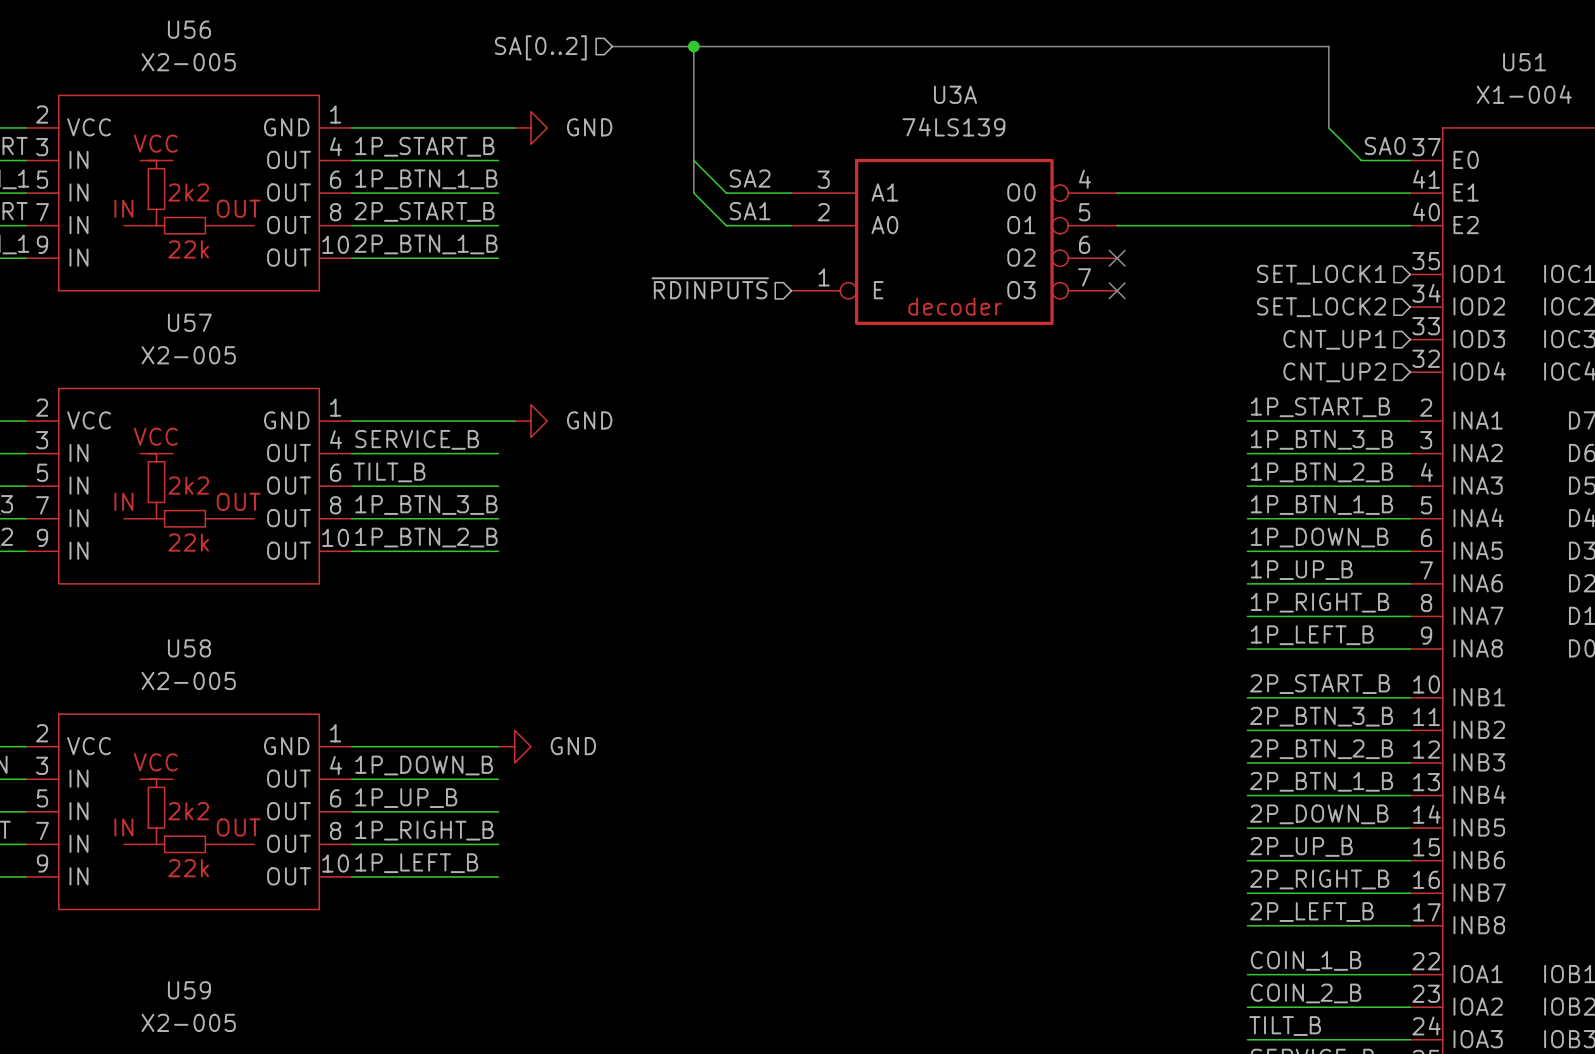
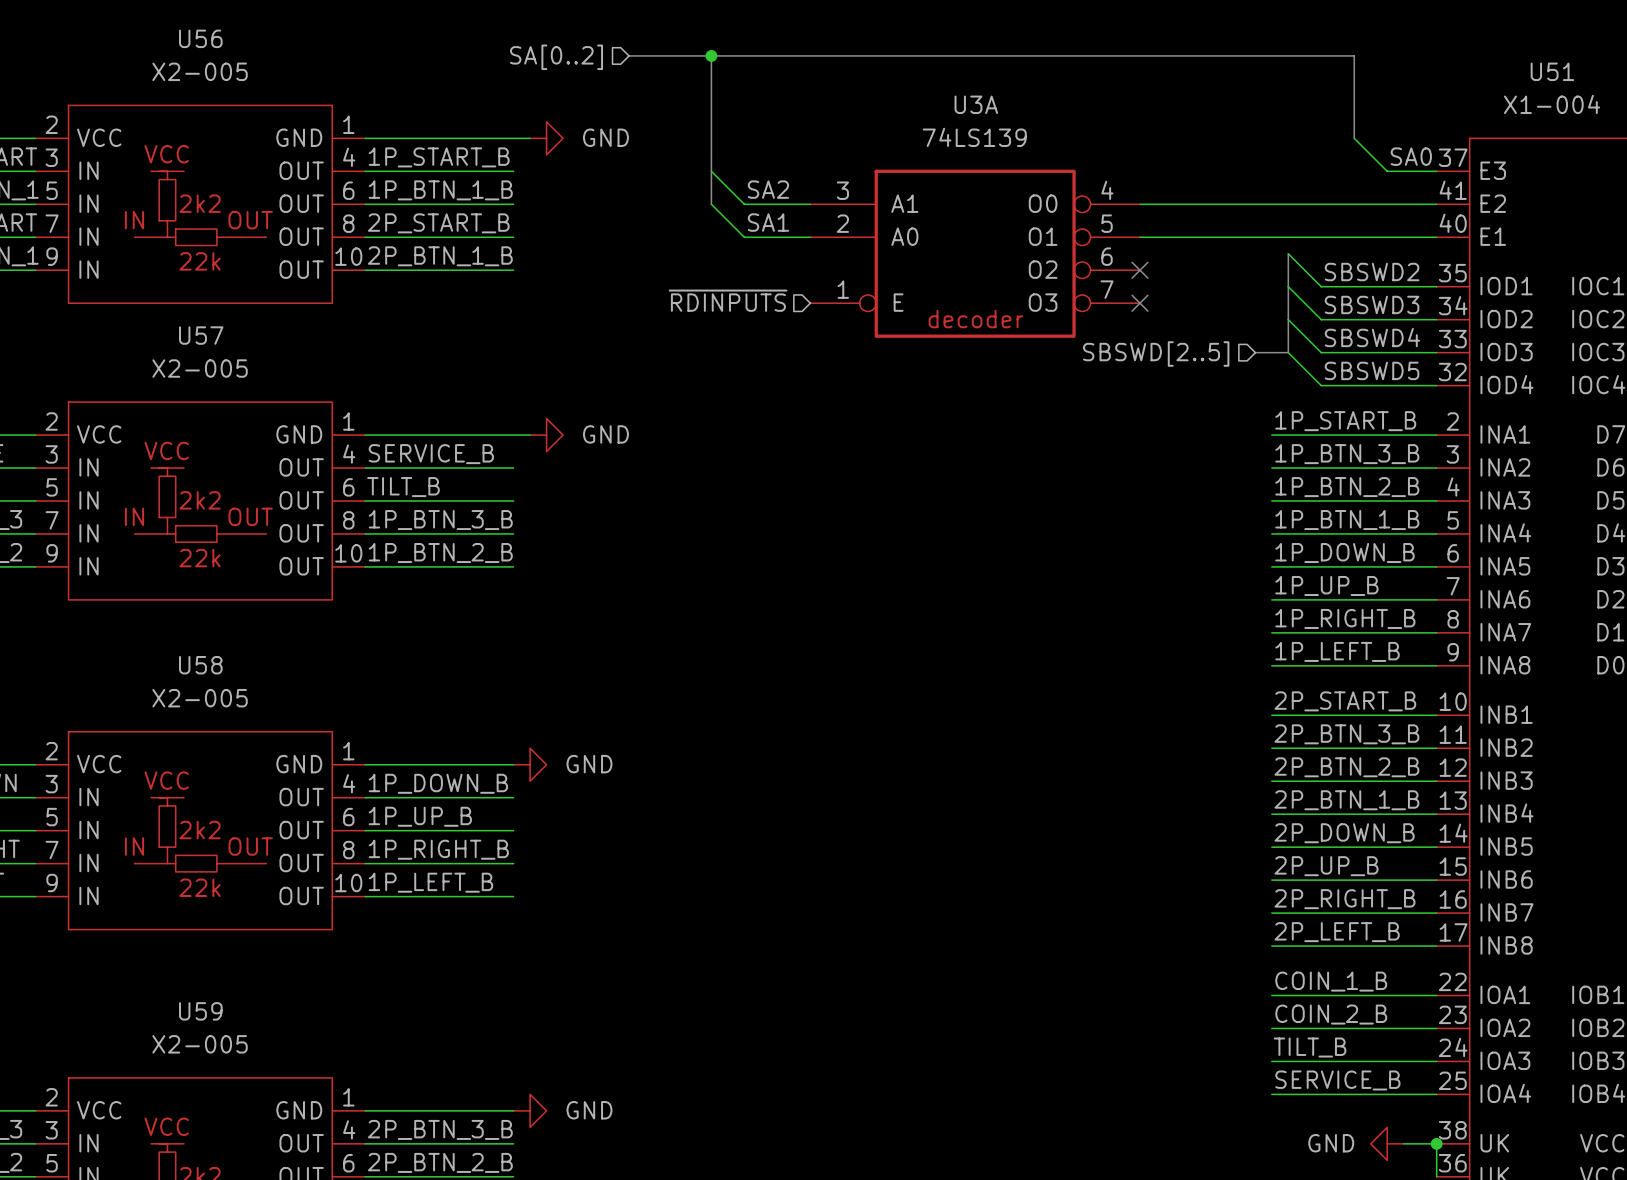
U51 pin name: E0 (1466, 159) -> E3 (1493, 170)
U51 pin name: E1 (1466, 192) -> E2 (1493, 203)
U51 pin name: E2 (1466, 225) -> E1 (1493, 236)
wire: none -> (1288, 253) (1321, 286) (1436, 286)
bus: none -> (1288, 253) (1288, 352) (1255, 352)
label: none -> SBSWD2 (1372, 272)
wire: none -> (1288, 286) (1321, 319) (1436, 319)
hierarchical label: SET_LOCK1 (1321, 274) -> none
label: none -> SBSWD3 (1372, 304)
wire: none -> (1288, 319) (1321, 352) (1436, 352)
hierarchical label: SET_LOCK2 (1321, 307) -> none
label: none -> SBSWD4 (1372, 337)
wire: none -> (1288, 352) (1321, 385) (1436, 385)
hierarchical label: CNT_UP1 (1334, 339) -> none
hierarchical label: none -> SBSWD[2..5] (1156, 354)
label: none -> SBSWD5 (1372, 370)
hierarchical label: CNT_UP2 (1334, 372) -> none

